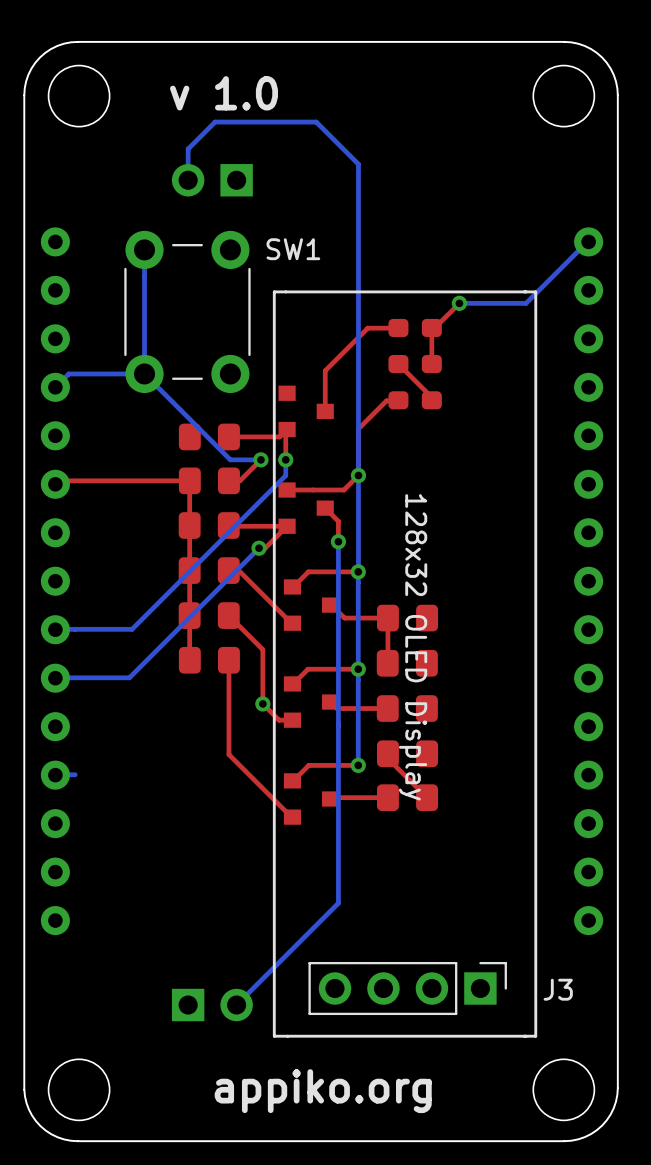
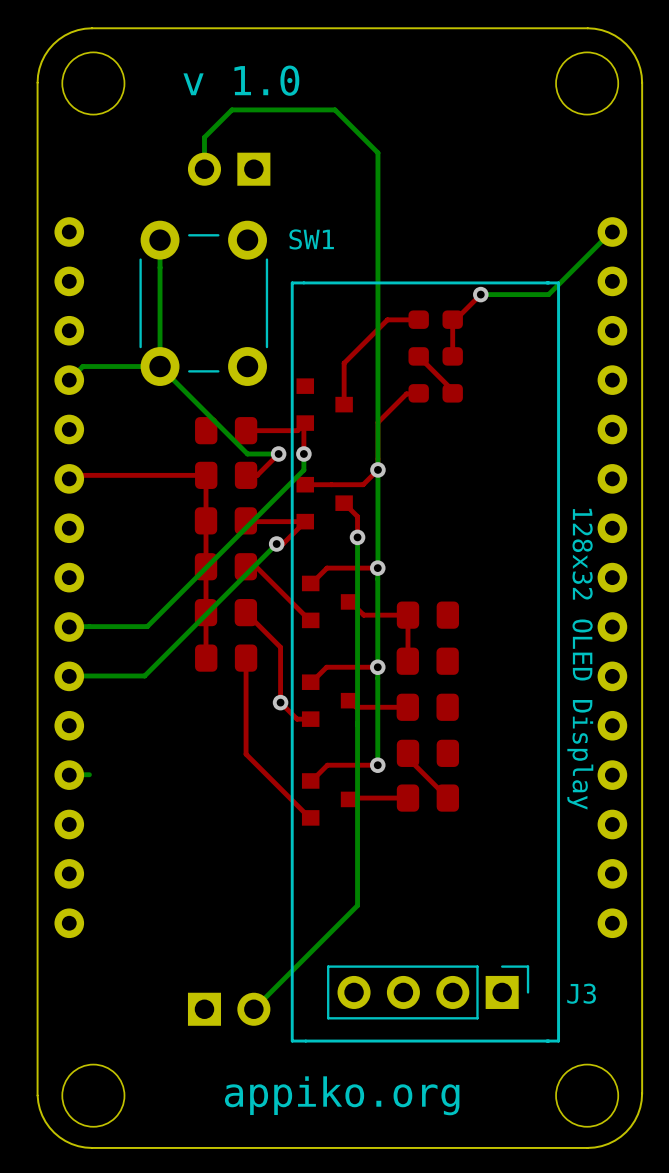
J3 text position: 128x32 OLED Display (413, 647) -> 128x32 OLED Display (580, 659)

